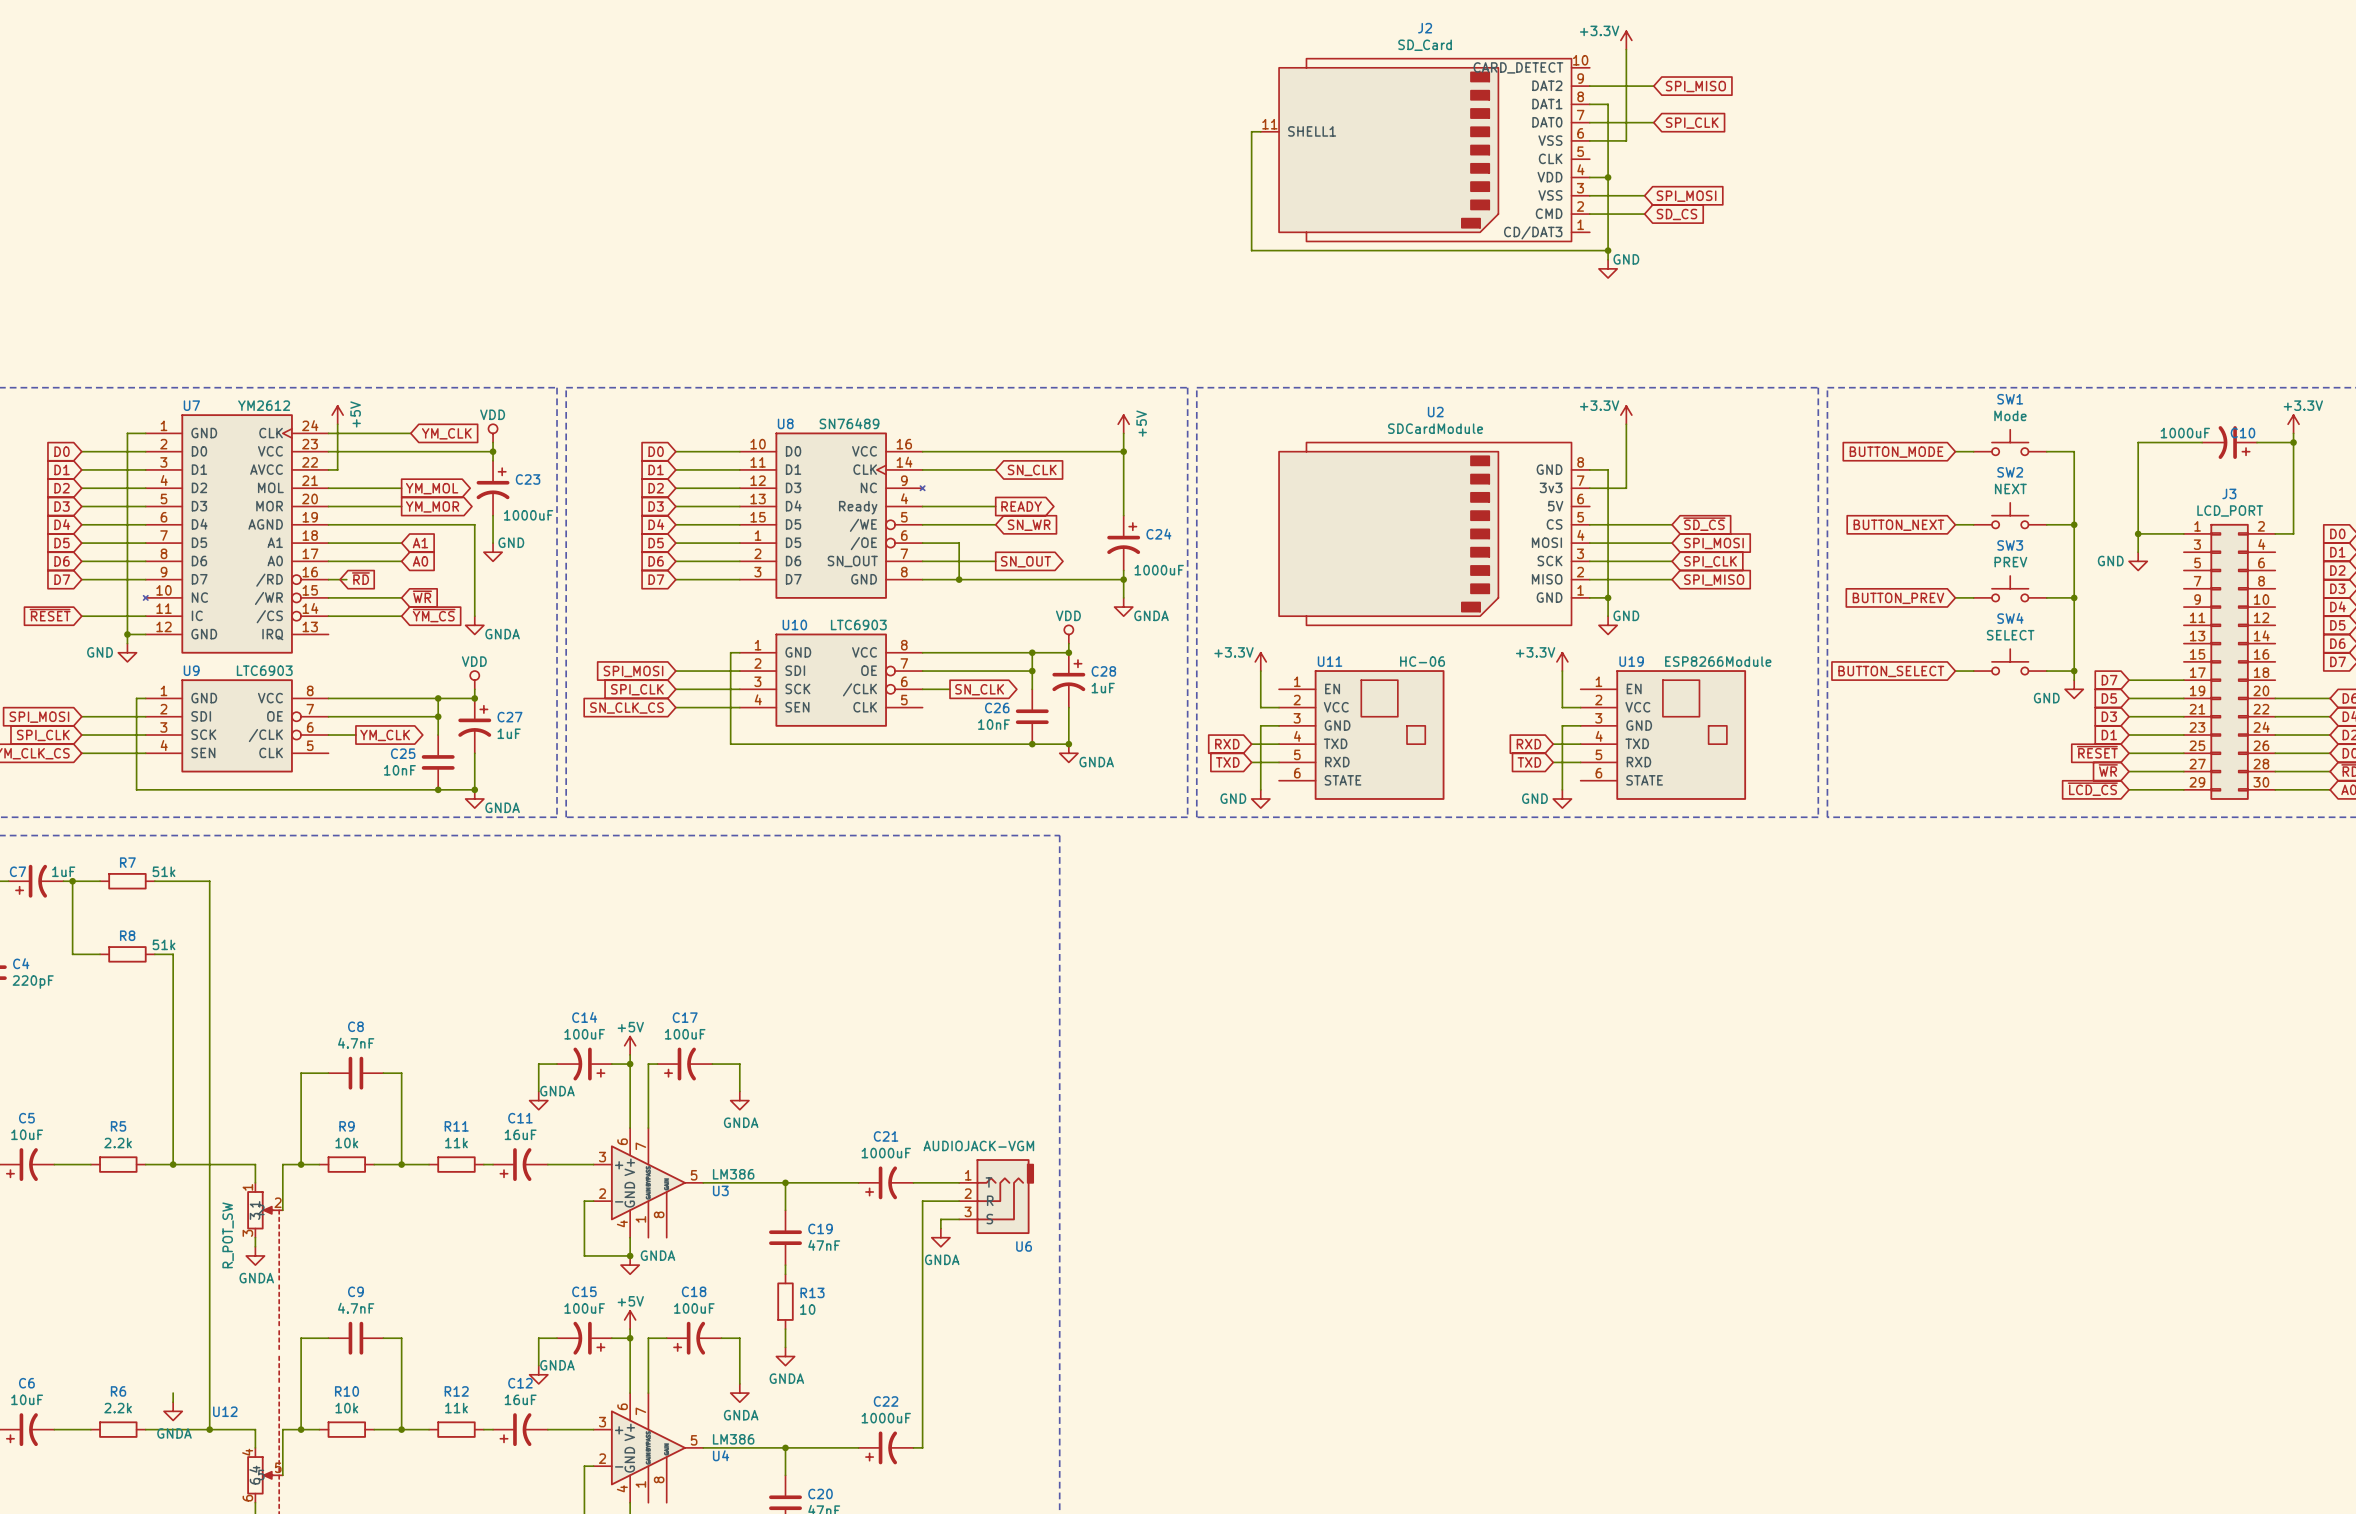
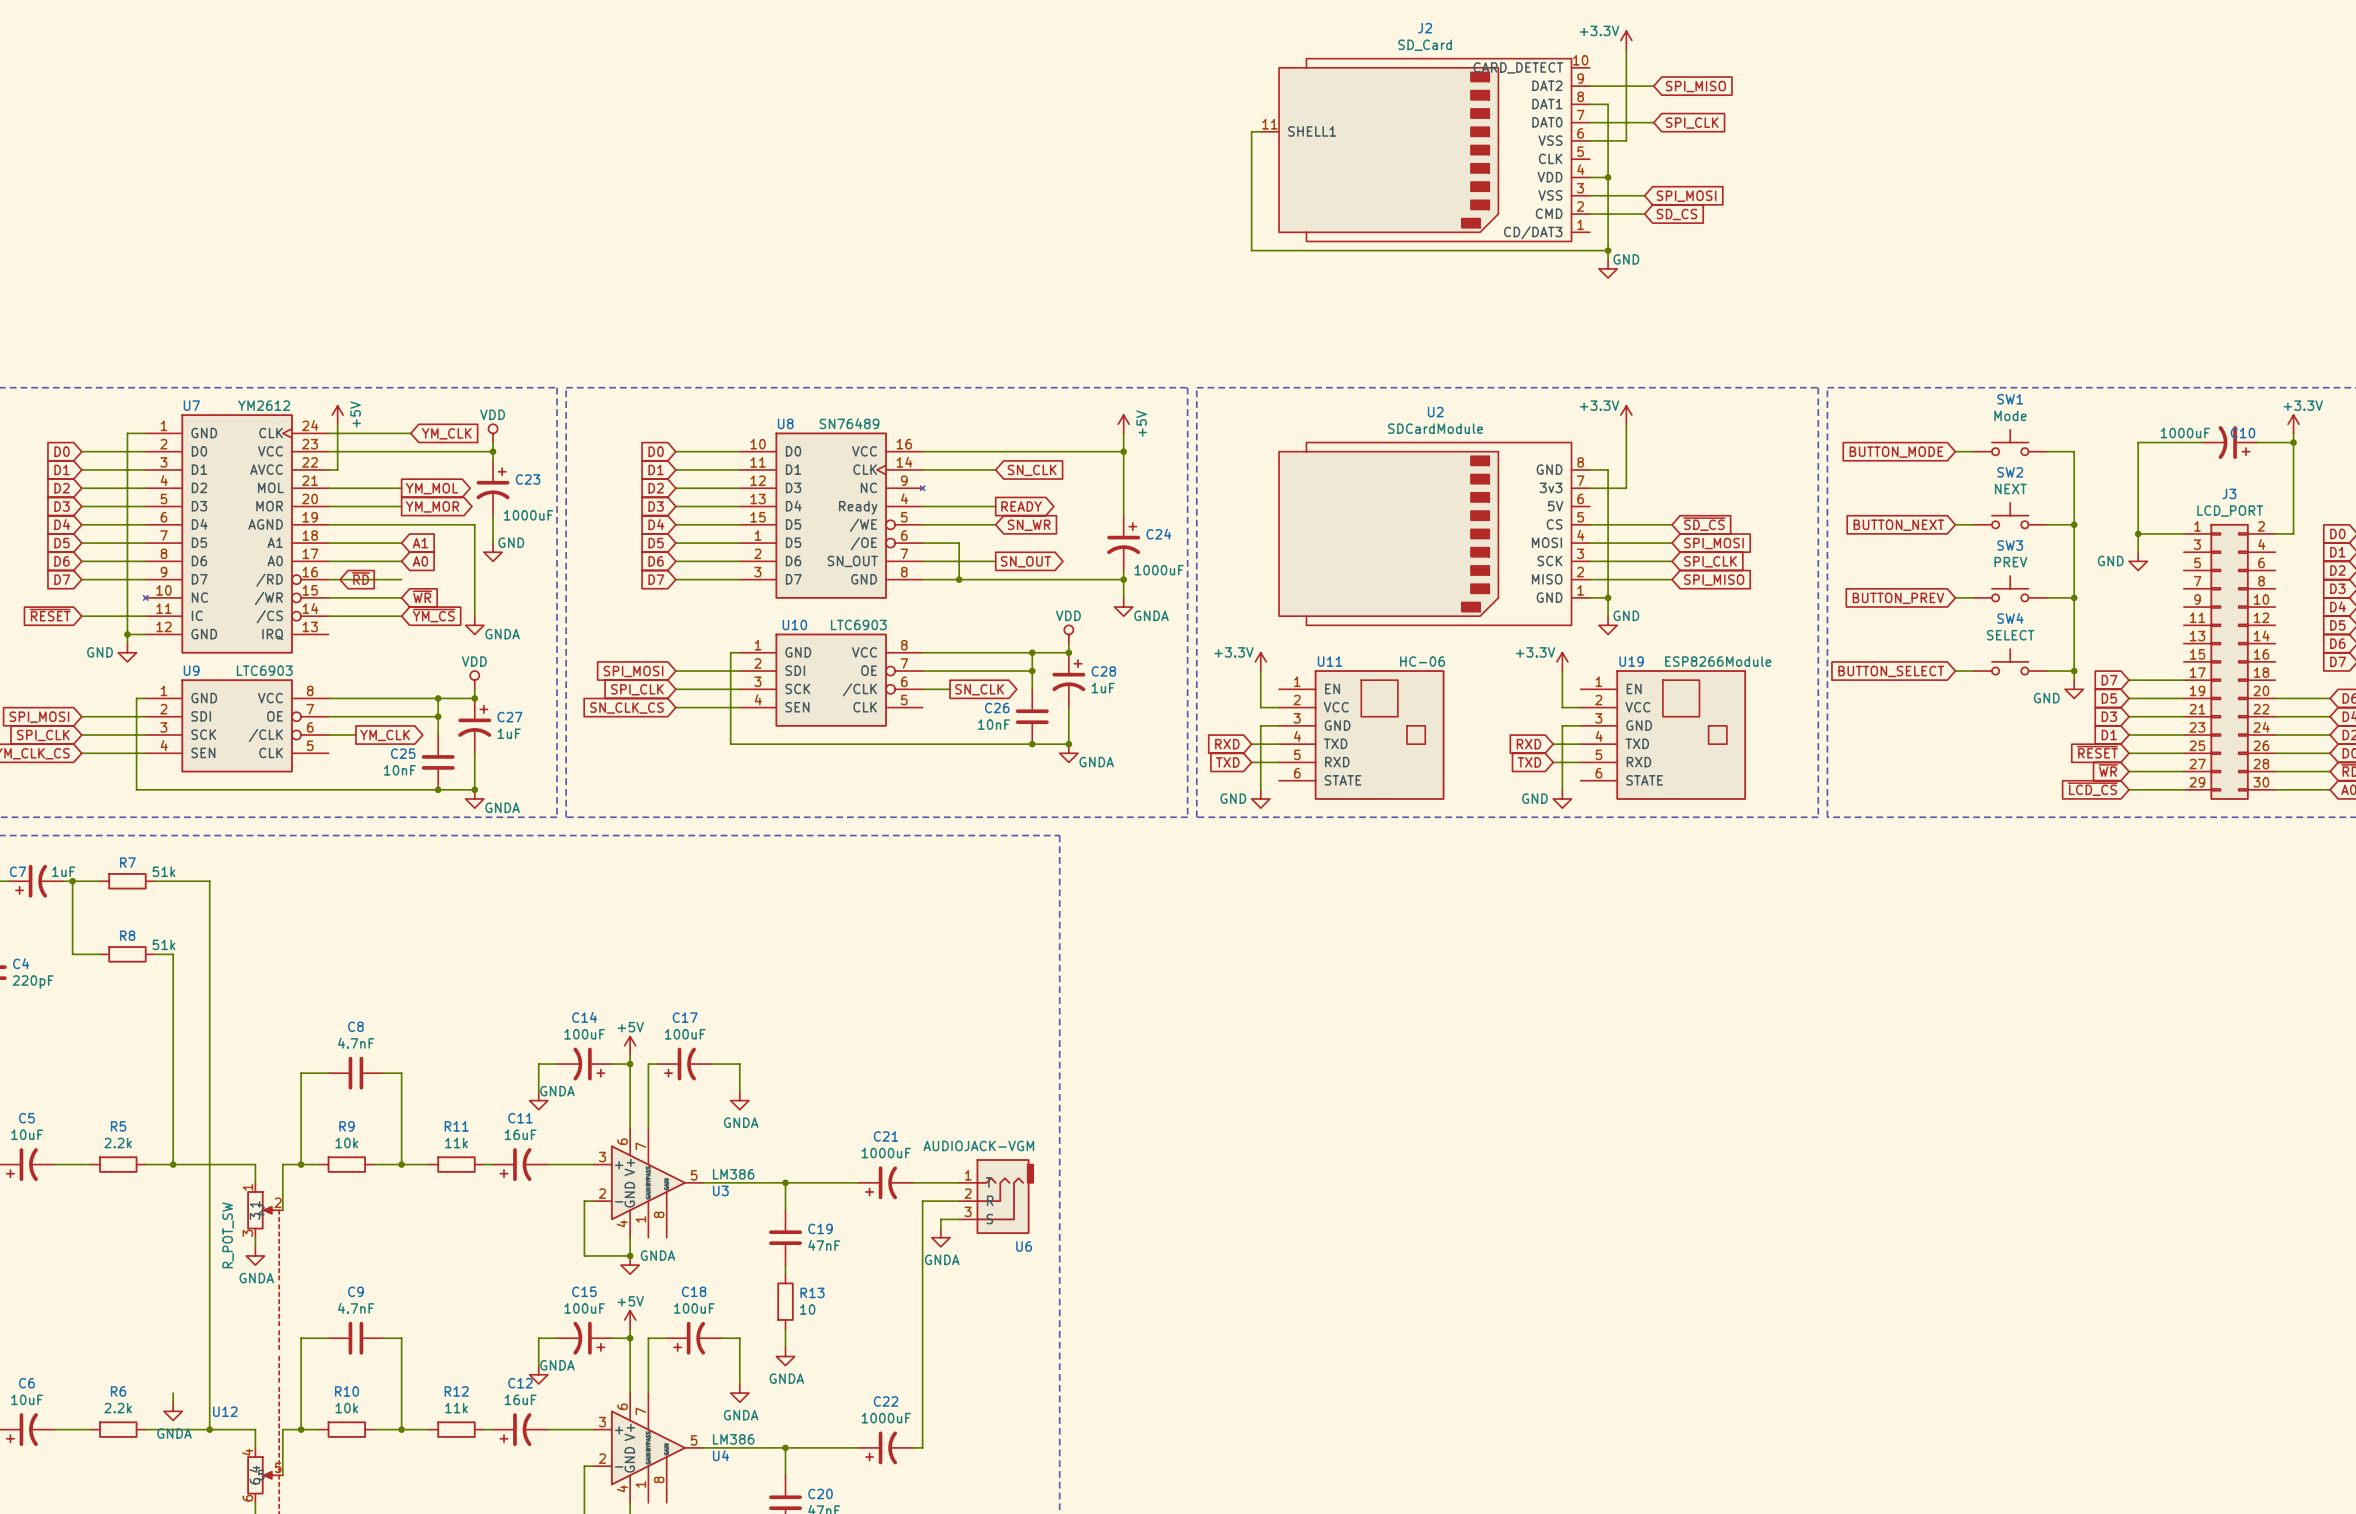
wire: none -> (346, 579) (401, 579)

